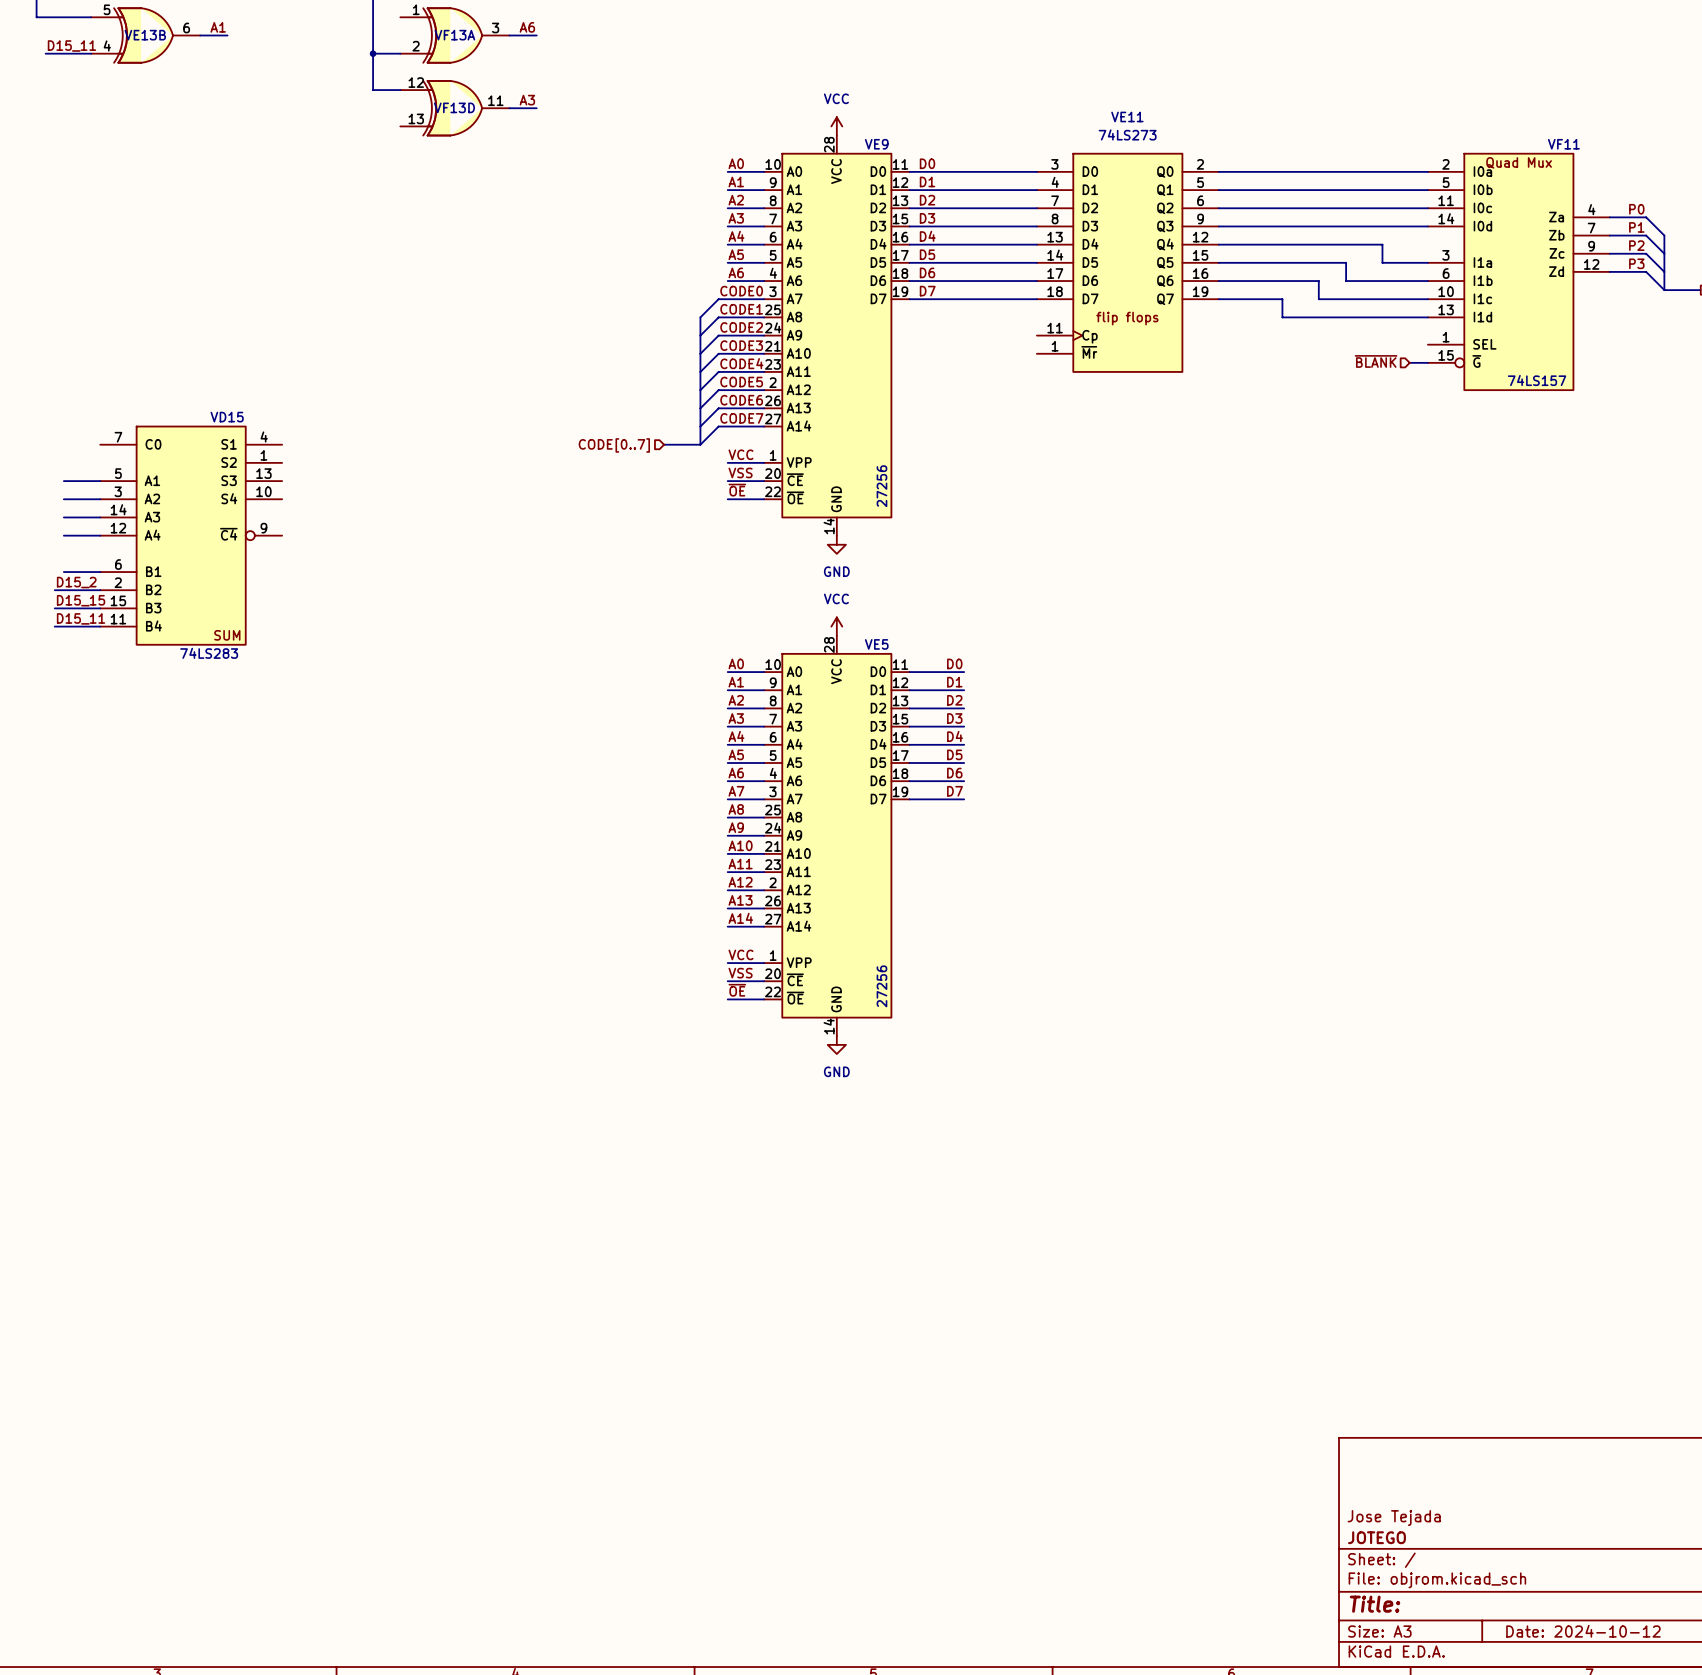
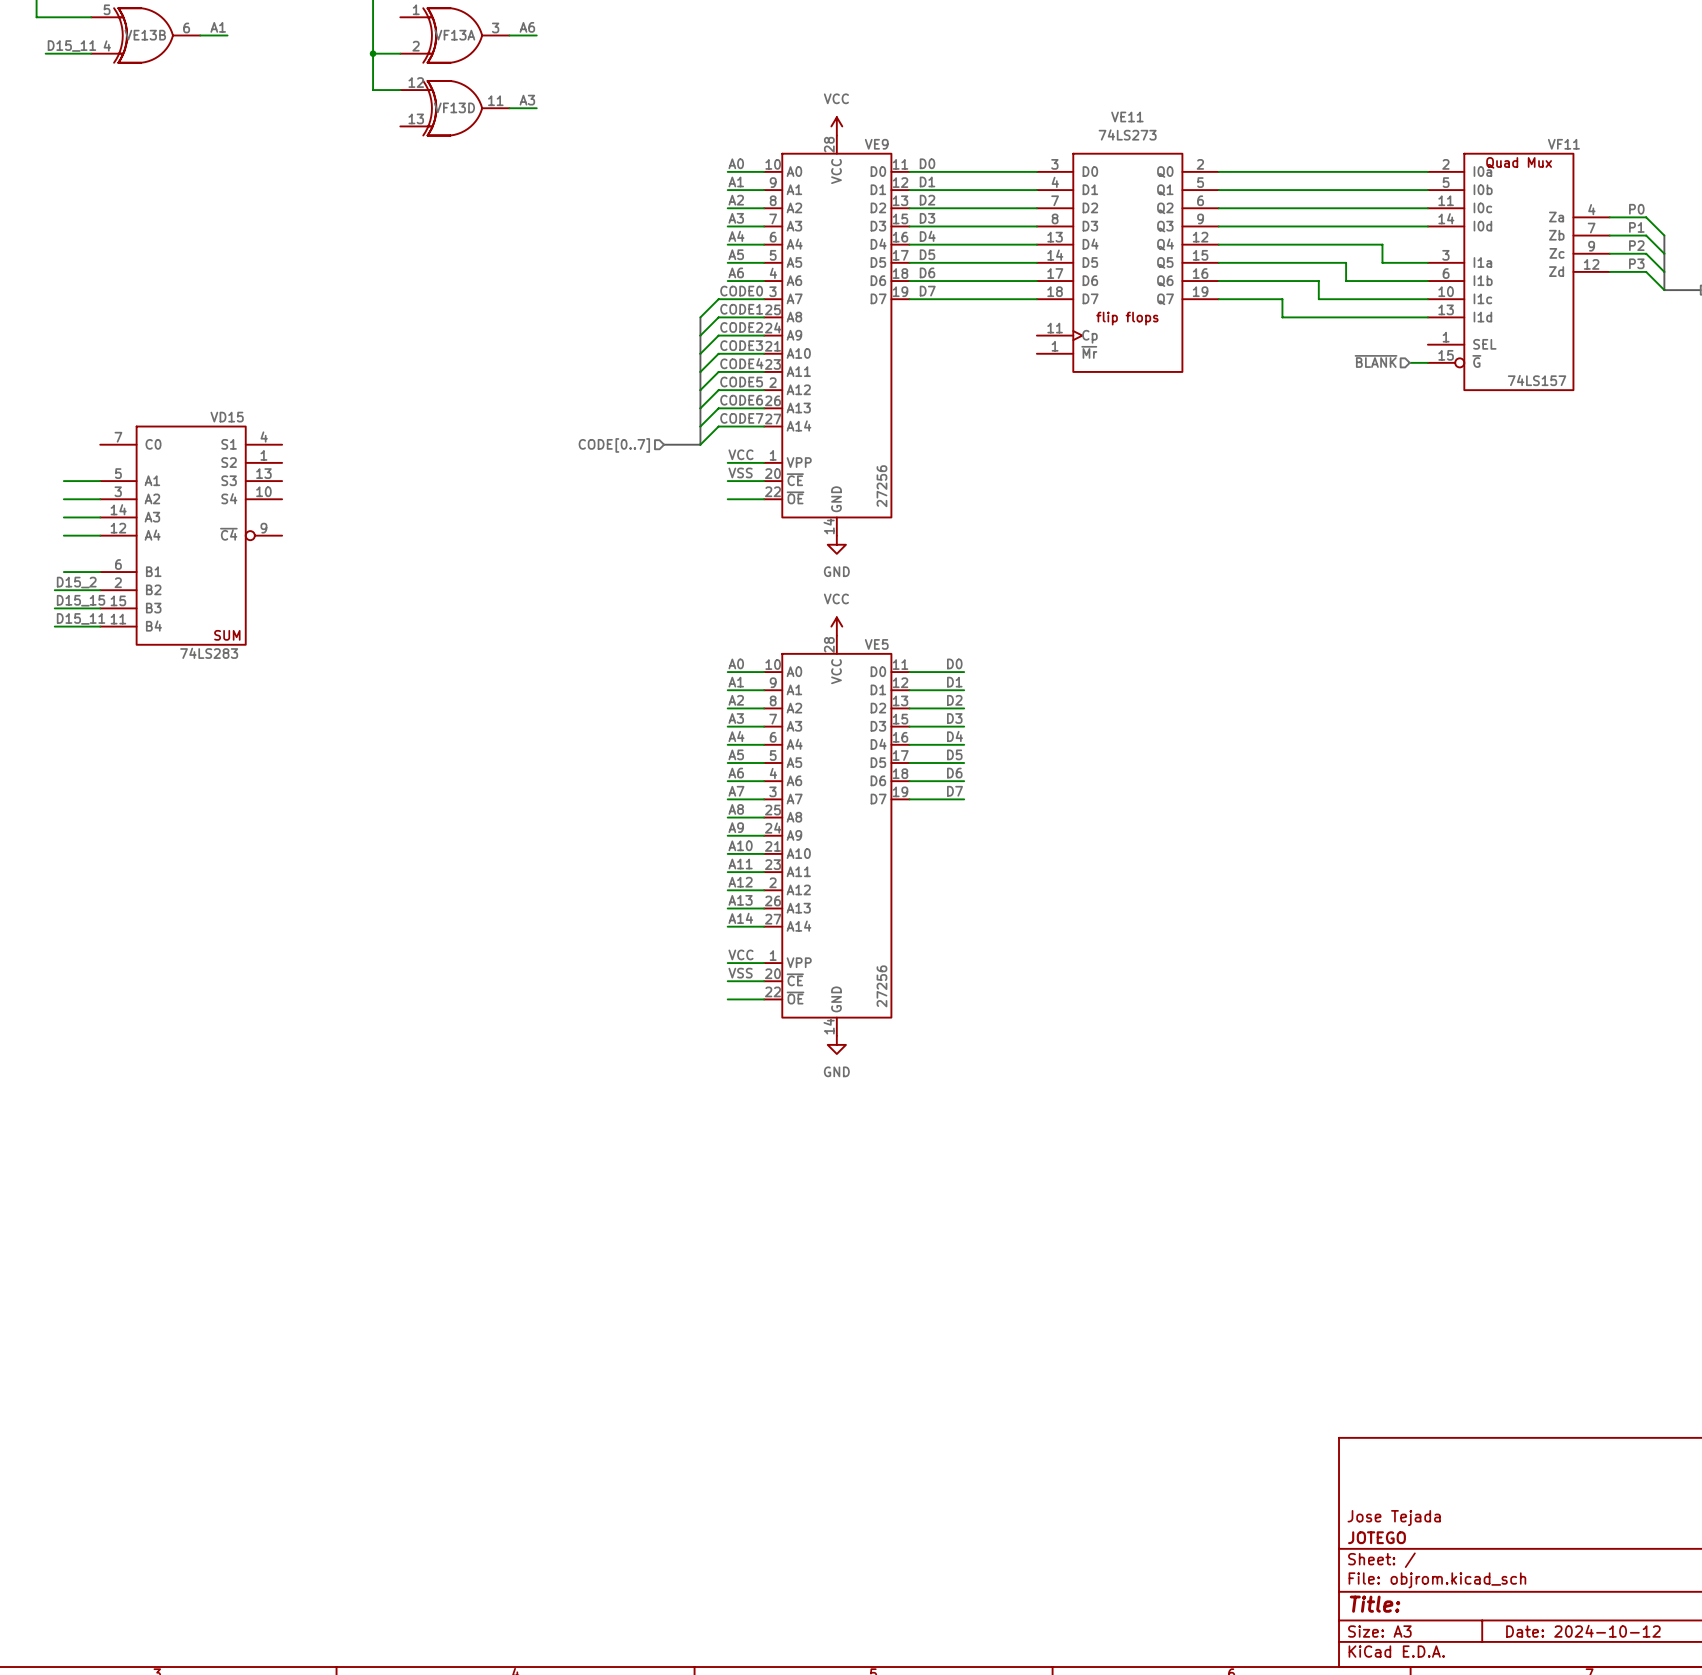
label: ~{OE} (737, 490) -> none
label: ~{OE} (737, 990) -> none

